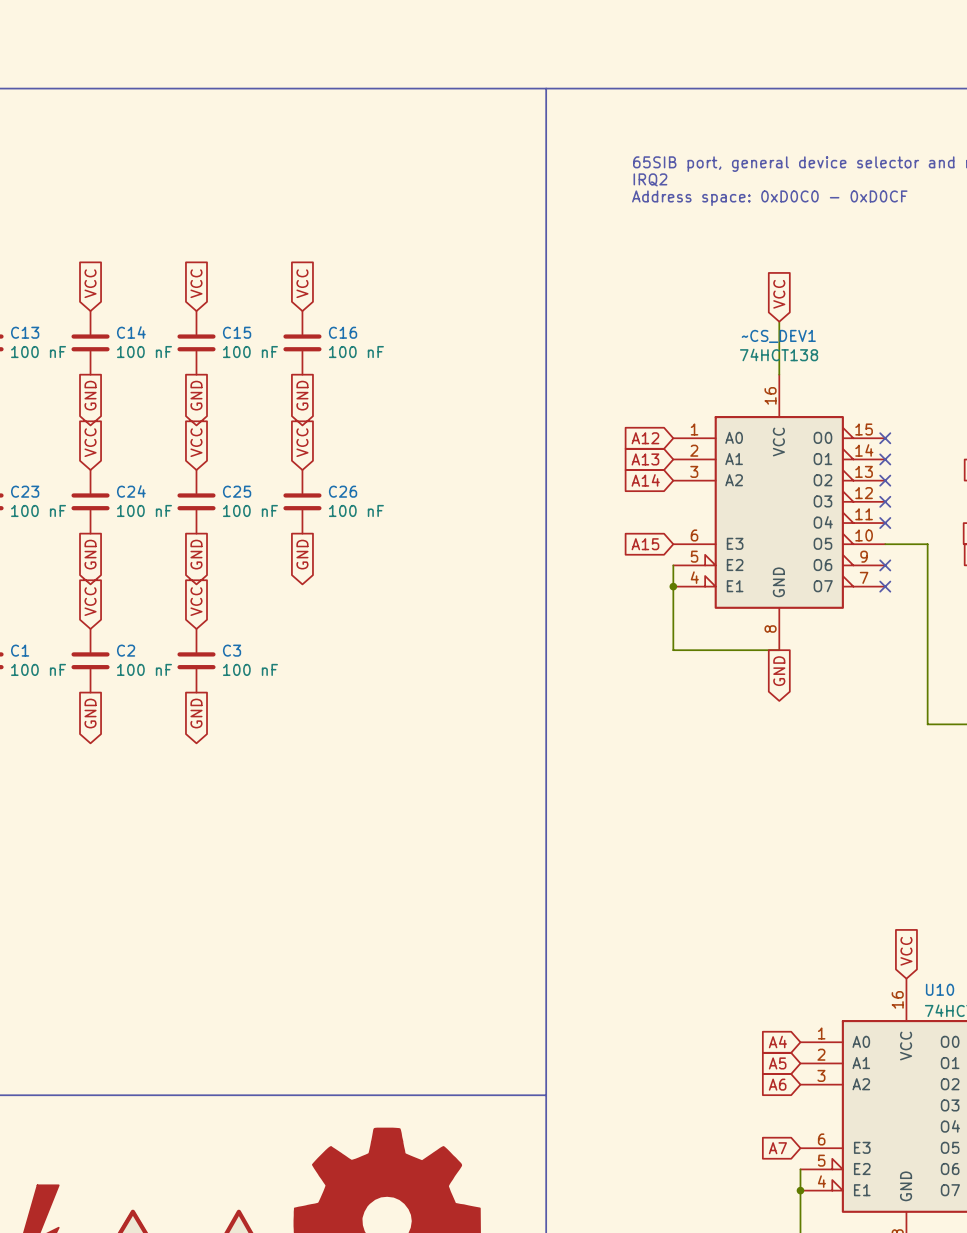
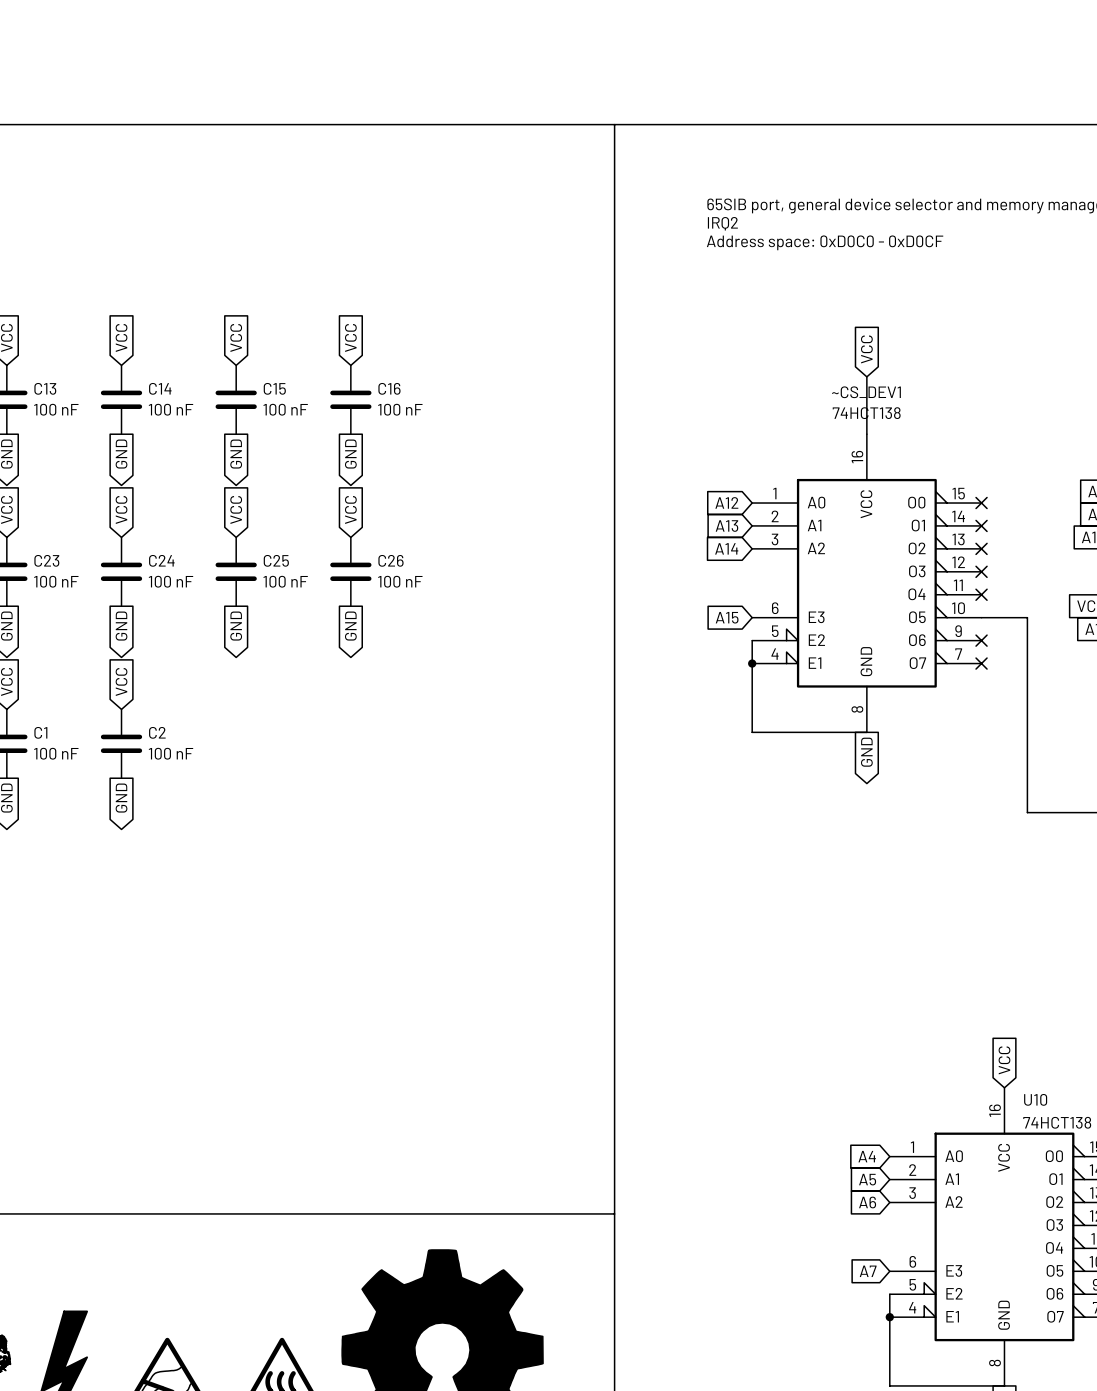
global label: VCC (196, 601) -> none
C3: 100 nF (196, 660) -> none
global label: GND (196, 713) -> none

